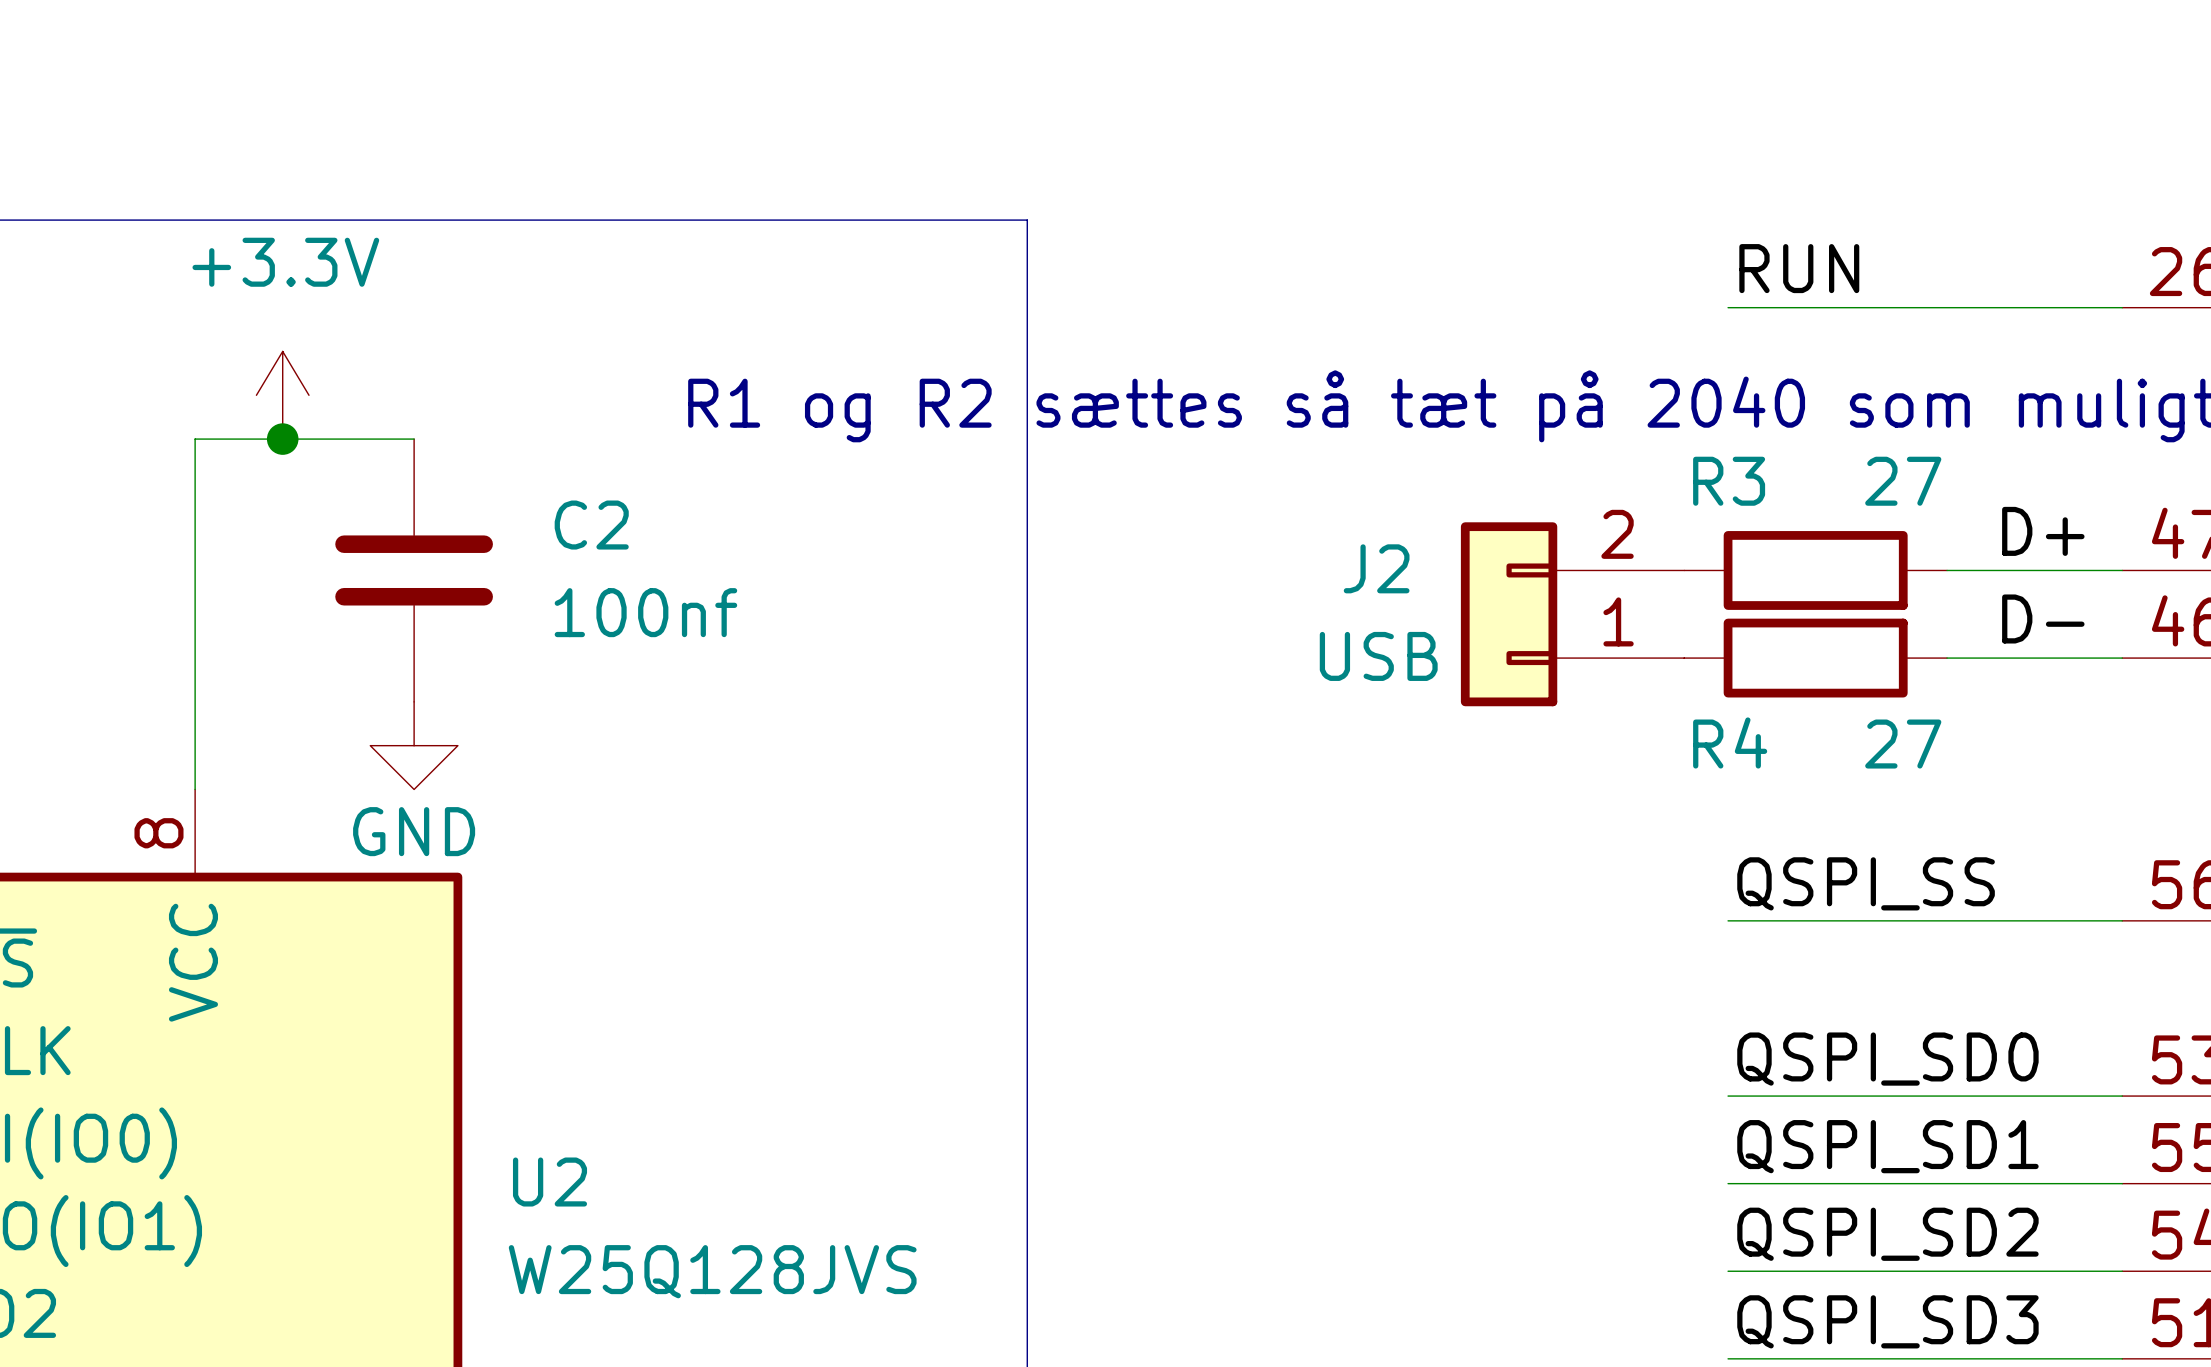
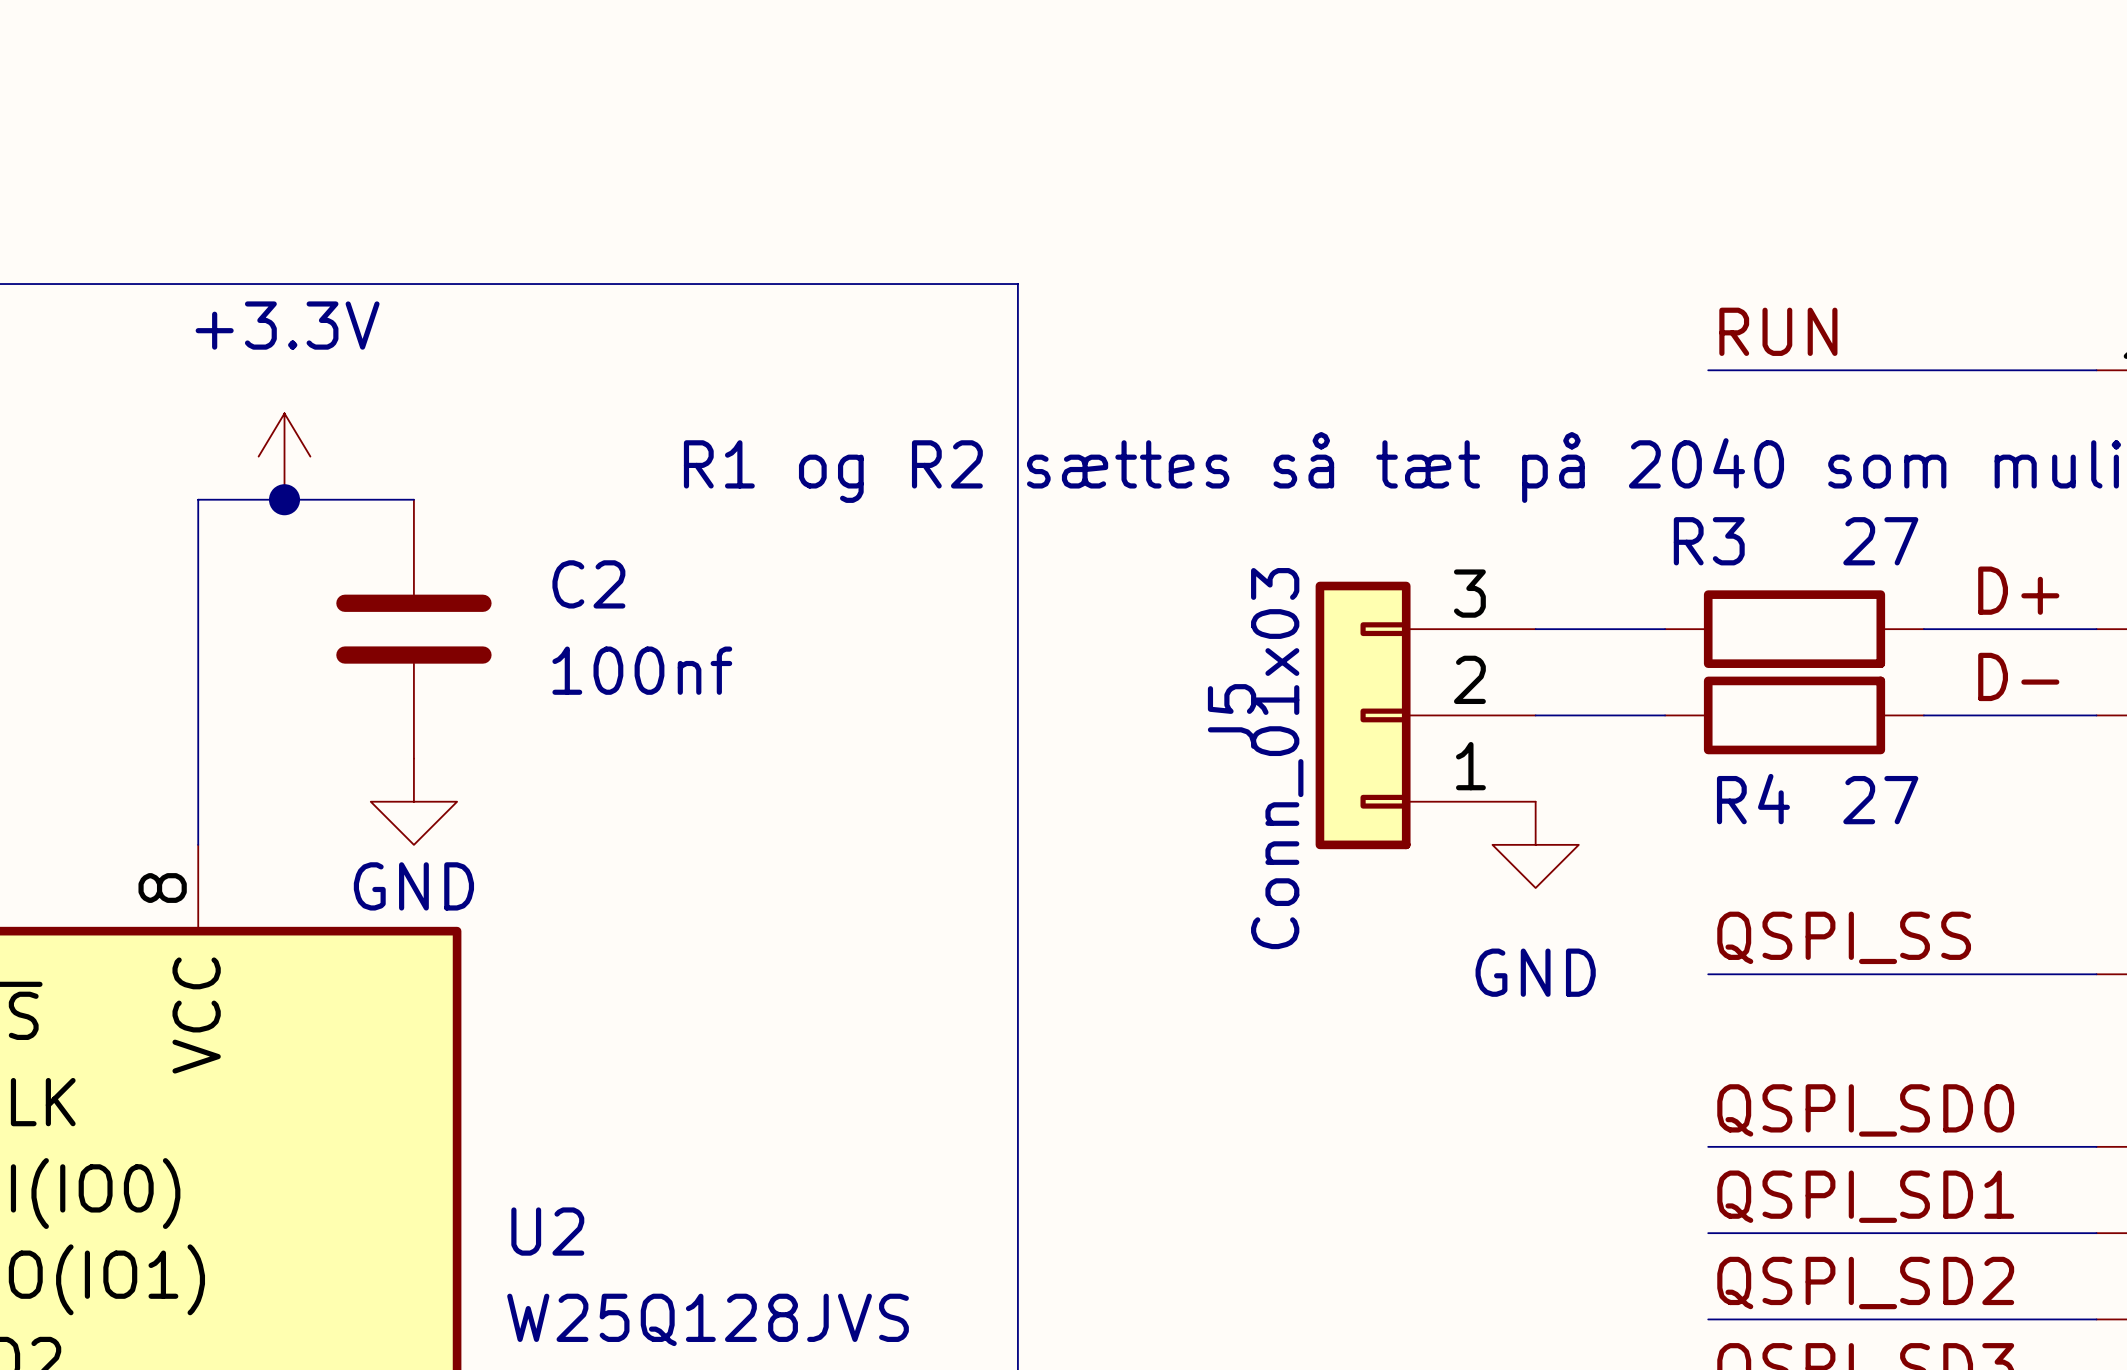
J2: USB (1572, 614) -> none
J5: none -> Conn_01x03 (1425, 715)
R4 name position: R4 (1730, 742) -> R4 (1753, 799)
power symbol: none -> GND (1535, 844)

